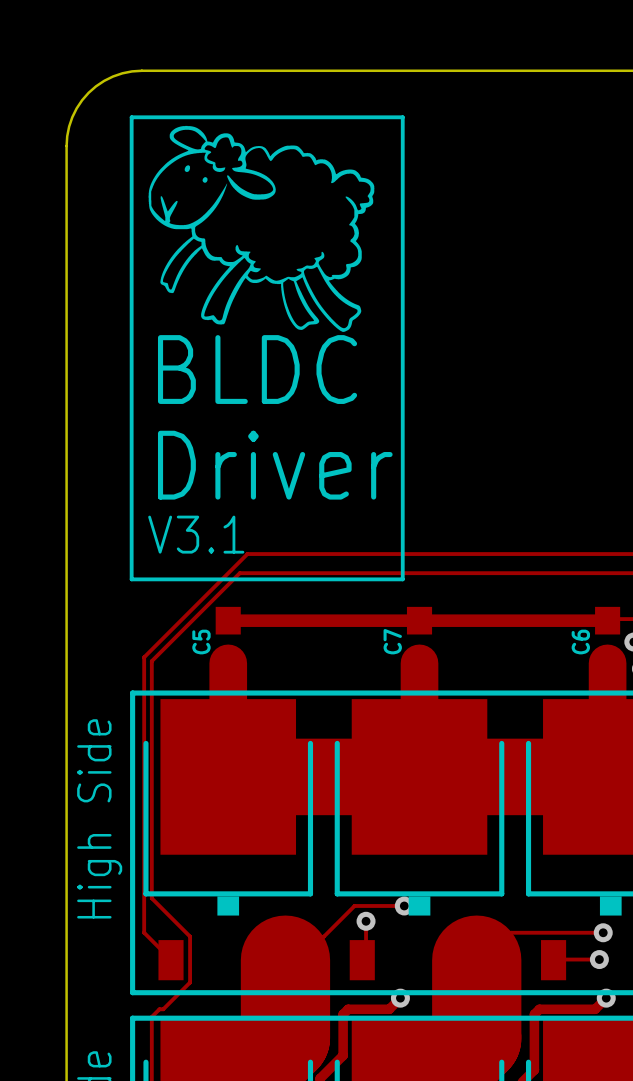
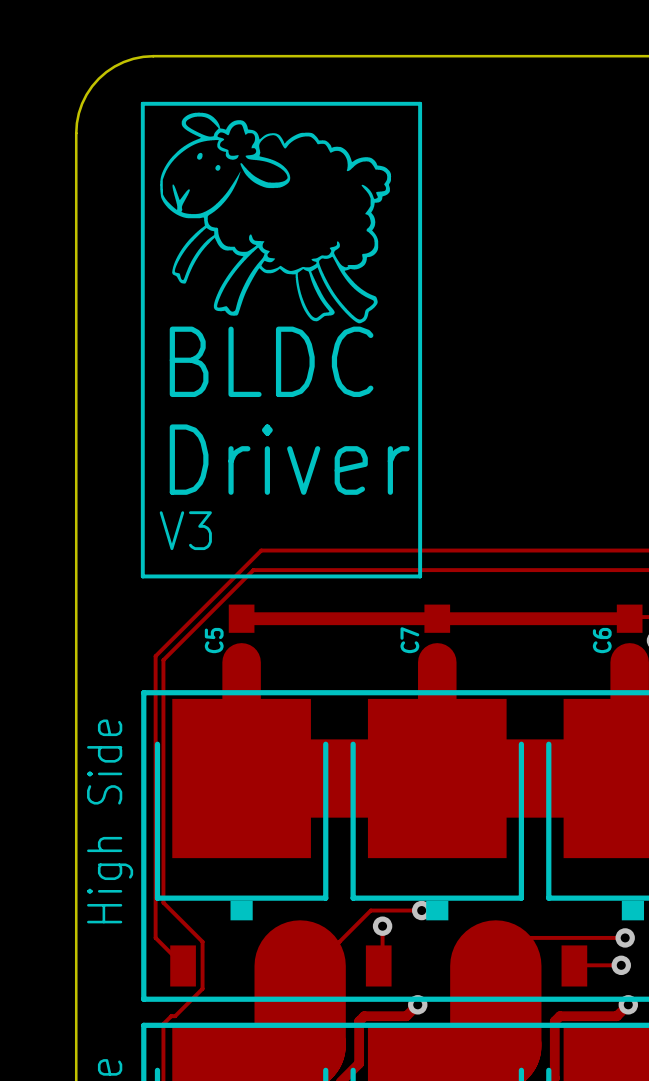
text: V3.1 (196, 534) -> V3 (185, 530)

